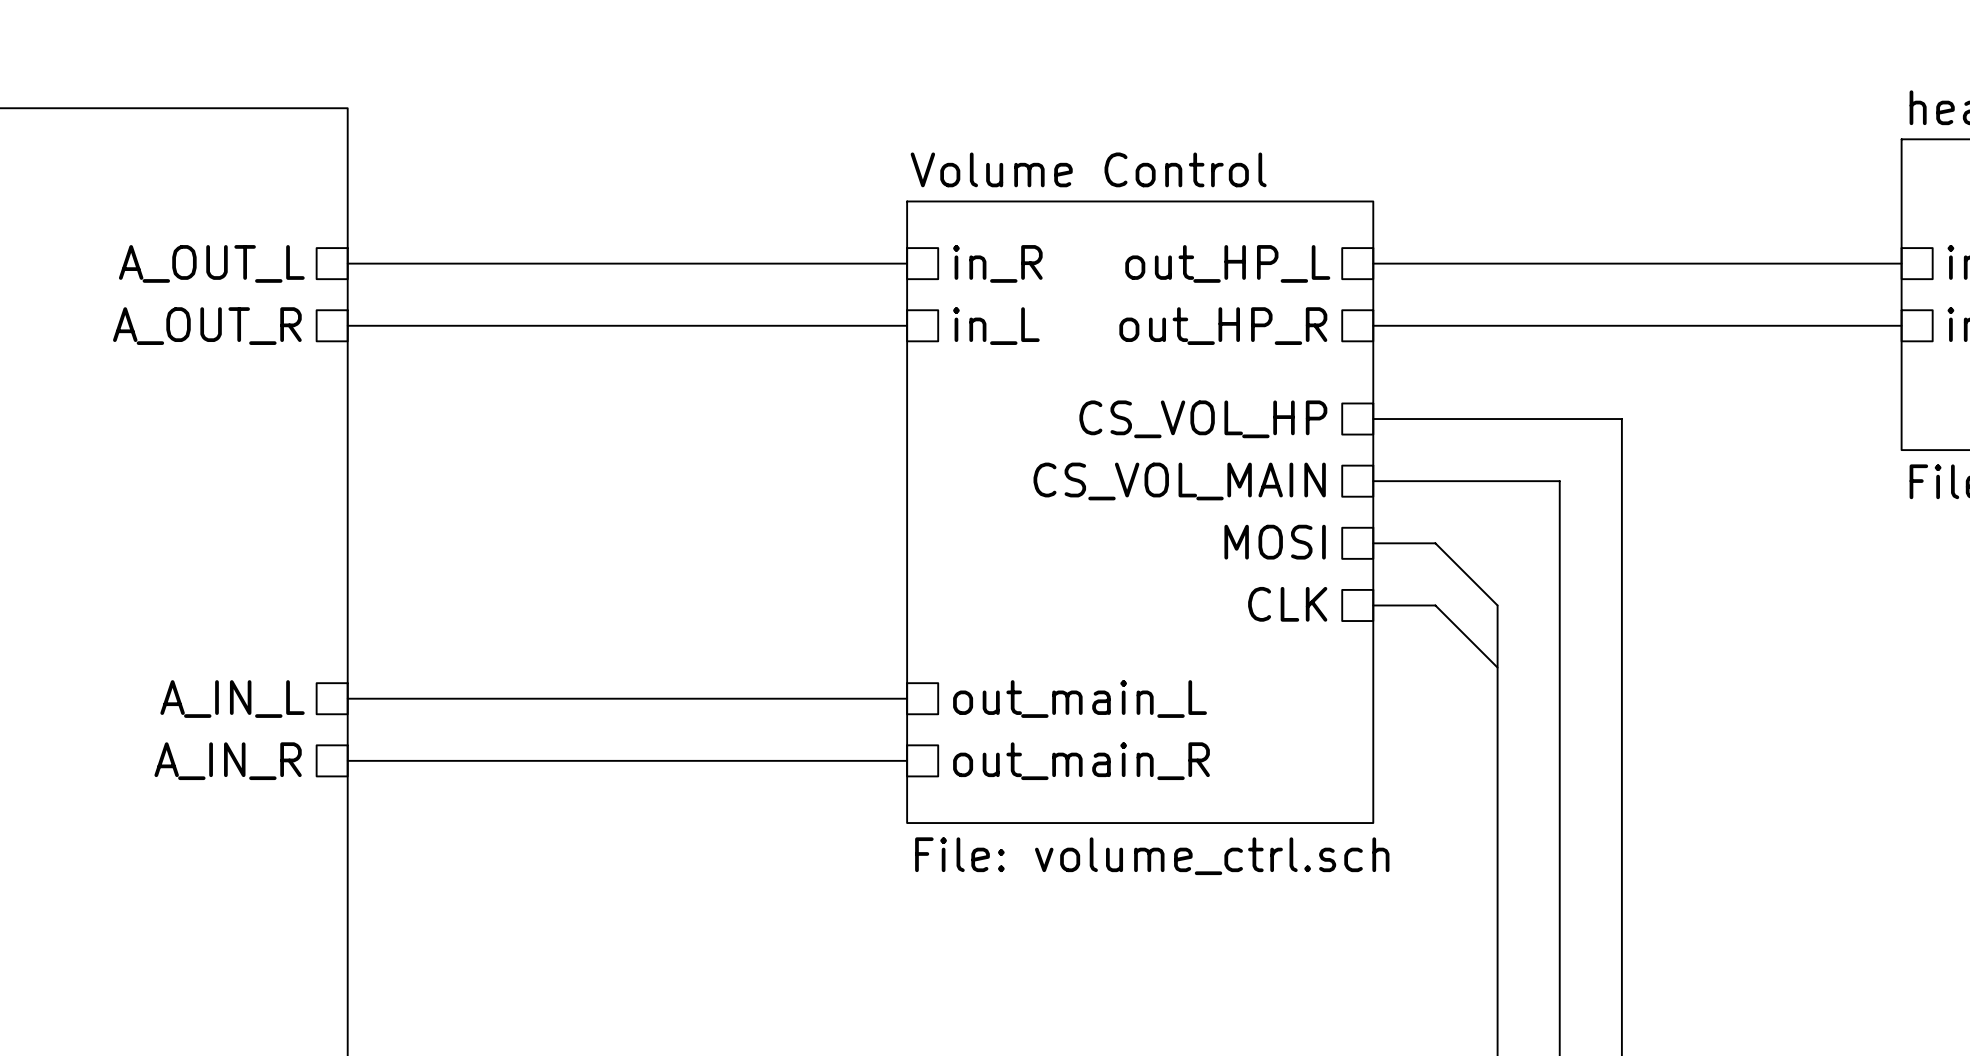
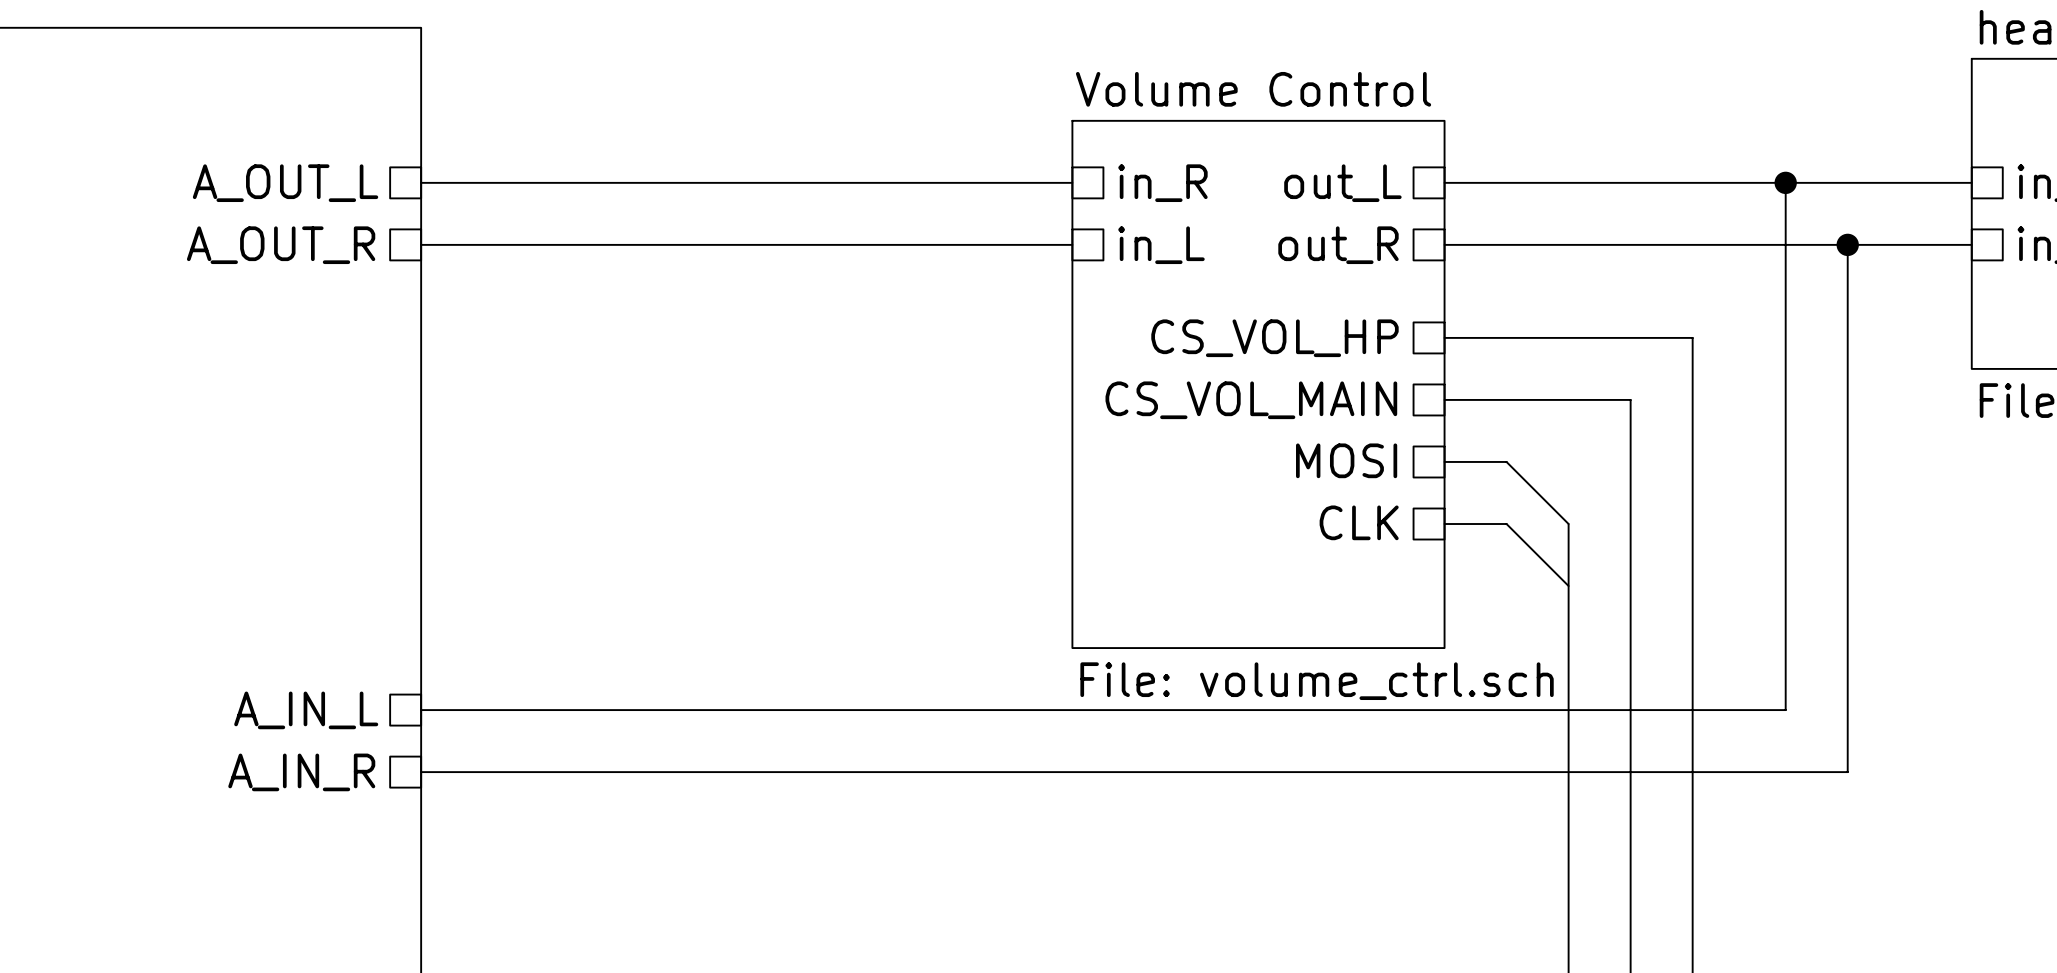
wire: none -> (979, 182) (1072, 182)
sheet pin position: in_R (997, 263) -> in_R (1162, 183)
sheet pin: out_HP_L (1227, 263) -> out_L (1342, 183)
wire: none -> (1785, 182) (1785, 710) (421, 710)
junction: none -> (1785, 182)
wire: none -> (979, 244) (1072, 244)
wire: none -> (1847, 244) (1847, 772) (421, 772)
junction: none -> (1847, 244)
sheet pin position: in_L (996, 326) -> in_L (1161, 245)
sheet pin: out_HP_R (1223, 326) -> out_R (1338, 245)
sheet Volume Control: none -> File: volume_ctrl.sch (1258, 384)
sheet Volume Control: File: volume_ctrl.sch (1140, 512) -> none
wire: (347, 698) (907, 698) -> none
sheet pin position: A_IN_L (232, 699) -> A_IN_L (306, 710)
sheet pin: out_main_L (1080, 699) -> none
wire: (347, 760) (907, 760) -> none
sheet pin position: A_IN_R (228, 761) -> A_IN_R (301, 772)
sheet pin: out_main_R (1081, 761) -> none

